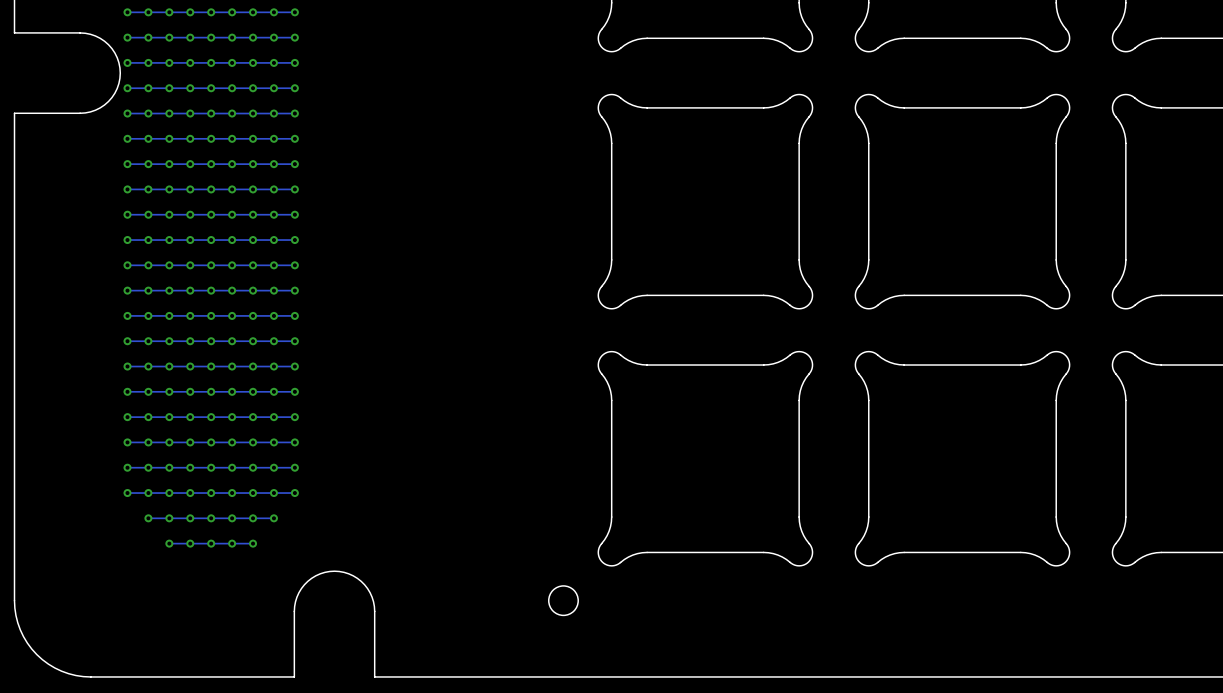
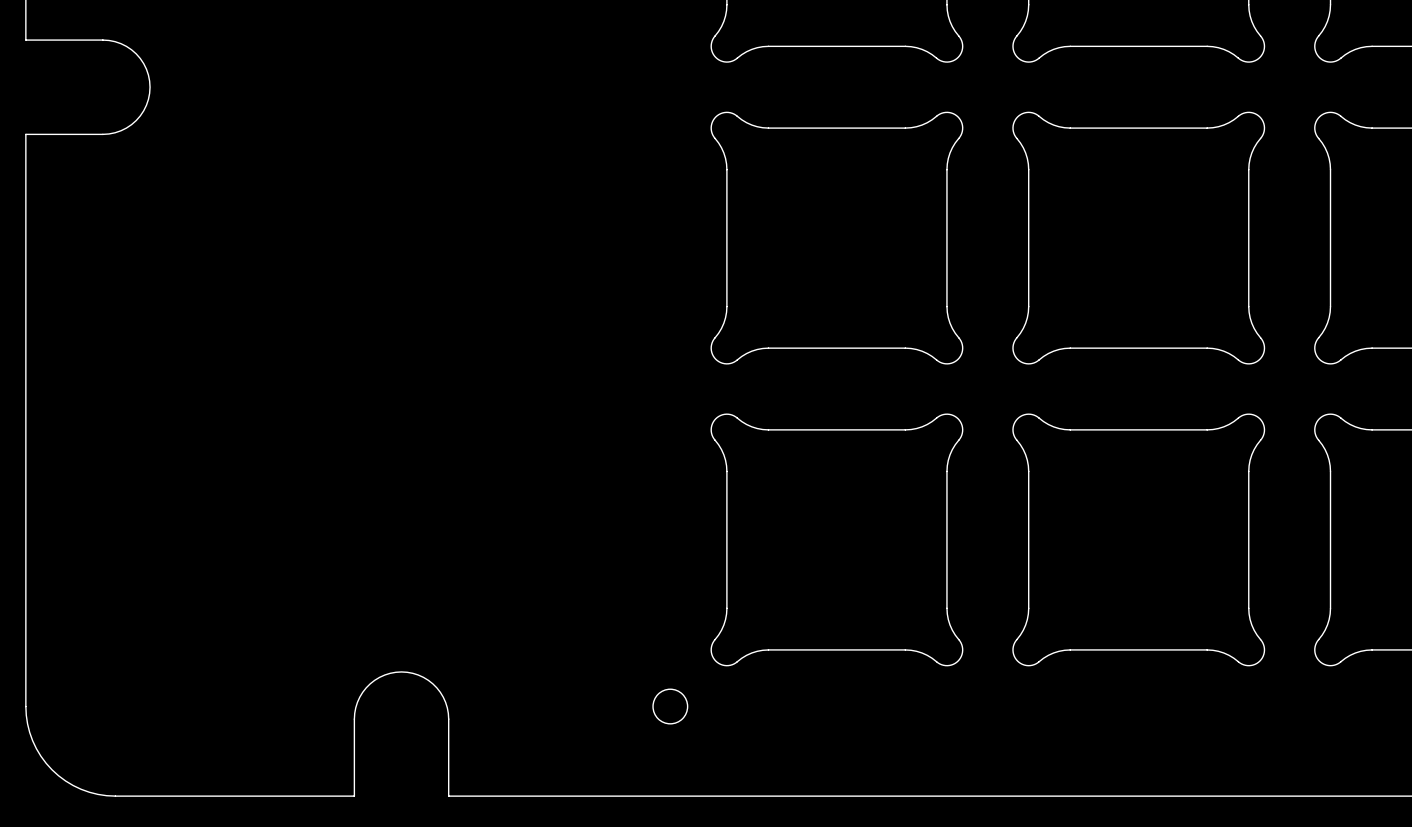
via: (127, 12) -> none
via: (148, 12) -> none
via: (169, 12) -> none
via: (190, 12) -> none
via: (211, 12) -> none
via: (232, 12) -> none
via: (253, 12) -> none
via: (273, 12) -> none
track: (294, 12) (127, 12) -> none
via: (294, 12) -> none
via: (127, 37) -> none
via: (148, 37) -> none
via: (169, 37) -> none
via: (190, 37) -> none
via: (211, 37) -> none
via: (232, 37) -> none
via: (253, 37) -> none
via: (273, 37) -> none
track: (294, 37) (127, 37) -> none
via: (294, 37) -> none
via: (127, 62) -> none
via: (148, 62) -> none
via: (169, 62) -> none
via: (190, 62) -> none
via: (211, 62) -> none
via: (232, 62) -> none
via: (253, 62) -> none
via: (273, 62) -> none
track: (294, 62) (127, 62) -> none
via: (294, 62) -> none
via: (127, 88) -> none
via: (148, 88) -> none
via: (169, 88) -> none
via: (190, 88) -> none
via: (211, 88) -> none
via: (232, 88) -> none
via: (253, 88) -> none
via: (273, 88) -> none
track: (294, 88) (127, 88) -> none
via: (294, 88) -> none
via: (127, 113) -> none
via: (148, 113) -> none
via: (169, 113) -> none
via: (190, 113) -> none
via: (211, 113) -> none
via: (232, 113) -> none
via: (253, 113) -> none
via: (273, 113) -> none
track: (294, 113) (127, 113) -> none
via: (294, 113) -> none
via: (127, 138) -> none
via: (148, 138) -> none
via: (169, 138) -> none
via: (190, 138) -> none
via: (211, 138) -> none
via: (232, 138) -> none
via: (253, 138) -> none
via: (273, 138) -> none
track: (294, 138) (127, 138) -> none
via: (294, 138) -> none
via: (127, 164) -> none
via: (148, 164) -> none
via: (169, 164) -> none
via: (190, 164) -> none
via: (211, 164) -> none
via: (232, 164) -> none
via: (253, 164) -> none
via: (273, 164) -> none
track: (294, 164) (127, 164) -> none
via: (294, 164) -> none
via: (127, 189) -> none
via: (148, 189) -> none
via: (169, 189) -> none
via: (190, 189) -> none
via: (211, 189) -> none
via: (232, 189) -> none
via: (253, 189) -> none
via: (273, 189) -> none
track: (294, 189) (127, 189) -> none
via: (294, 189) -> none
via: (127, 214) -> none
via: (148, 214) -> none
via: (169, 214) -> none
via: (190, 214) -> none
via: (211, 214) -> none
via: (232, 214) -> none
via: (253, 214) -> none
via: (273, 214) -> none
track: (294, 214) (127, 214) -> none
via: (294, 214) -> none
via: (127, 240) -> none
via: (148, 240) -> none
via: (169, 240) -> none
via: (190, 240) -> none
via: (211, 240) -> none
via: (232, 240) -> none
via: (253, 240) -> none
via: (273, 240) -> none
track: (294, 240) (127, 240) -> none
via: (294, 240) -> none
via: (127, 265) -> none
via: (148, 265) -> none
via: (169, 265) -> none
via: (190, 265) -> none
via: (211, 265) -> none
via: (232, 265) -> none
via: (253, 265) -> none
via: (273, 265) -> none
track: (294, 265) (127, 265) -> none
via: (294, 265) -> none
via: (127, 290) -> none
via: (148, 290) -> none
via: (169, 290) -> none
via: (190, 290) -> none
via: (211, 290) -> none
via: (232, 290) -> none
via: (253, 290) -> none
via: (273, 290) -> none
track: (294, 290) (127, 290) -> none
via: (294, 290) -> none
via: (127, 315) -> none
via: (148, 315) -> none
via: (169, 315) -> none
via: (190, 315) -> none
via: (211, 315) -> none
via: (232, 315) -> none
via: (253, 315) -> none
via: (273, 315) -> none
track: (294, 315) (127, 315) -> none
via: (294, 315) -> none
via: (127, 341) -> none
via: (148, 341) -> none
via: (169, 341) -> none
via: (190, 341) -> none
via: (211, 341) -> none
via: (232, 341) -> none
via: (253, 341) -> none
via: (273, 341) -> none
track: (294, 341) (127, 341) -> none
via: (294, 341) -> none
via: (127, 366) -> none
via: (148, 366) -> none
via: (169, 366) -> none
via: (190, 366) -> none
via: (211, 366) -> none
via: (232, 366) -> none
via: (253, 366) -> none
via: (273, 366) -> none
track: (294, 366) (127, 366) -> none
via: (294, 366) -> none
via: (127, 391) -> none
via: (148, 391) -> none
via: (169, 391) -> none
via: (190, 391) -> none
via: (211, 391) -> none
via: (232, 391) -> none
via: (253, 391) -> none
via: (273, 391) -> none
track: (294, 391) (127, 391) -> none
via: (294, 391) -> none
via: (127, 417) -> none
via: (148, 417) -> none
via: (169, 417) -> none
via: (190, 417) -> none
via: (211, 417) -> none
via: (232, 417) -> none
via: (253, 417) -> none
via: (273, 417) -> none
track: (294, 417) (127, 417) -> none
via: (294, 417) -> none
via: (127, 442) -> none
via: (148, 442) -> none
via: (169, 442) -> none
via: (190, 442) -> none
via: (211, 442) -> none
via: (232, 442) -> none
via: (253, 442) -> none
via: (273, 442) -> none
track: (294, 442) (127, 442) -> none
via: (294, 442) -> none
via: (127, 467) -> none
via: (148, 467) -> none
via: (169, 467) -> none
via: (190, 467) -> none
via: (211, 467) -> none
via: (232, 467) -> none
via: (253, 467) -> none
via: (273, 467) -> none
track: (294, 467) (127, 467) -> none
via: (294, 467) -> none
via: (127, 493) -> none
via: (148, 493) -> none
via: (169, 493) -> none
via: (190, 493) -> none
via: (211, 493) -> none
via: (232, 493) -> none
via: (253, 493) -> none
via: (273, 493) -> none
track: (294, 493) (127, 493) -> none
via: (294, 493) -> none
via: (148, 518) -> none
via: (169, 518) -> none
via: (190, 518) -> none
via: (211, 518) -> none
via: (232, 518) -> none
via: (253, 518) -> none
track: (273, 518) (148, 518) -> none
via: (273, 518) -> none
via: (169, 543) -> none
via: (190, 543) -> none
via: (211, 543) -> none
via: (232, 543) -> none
track: (253, 543) (169, 543) -> none
via: (253, 543) -> none

